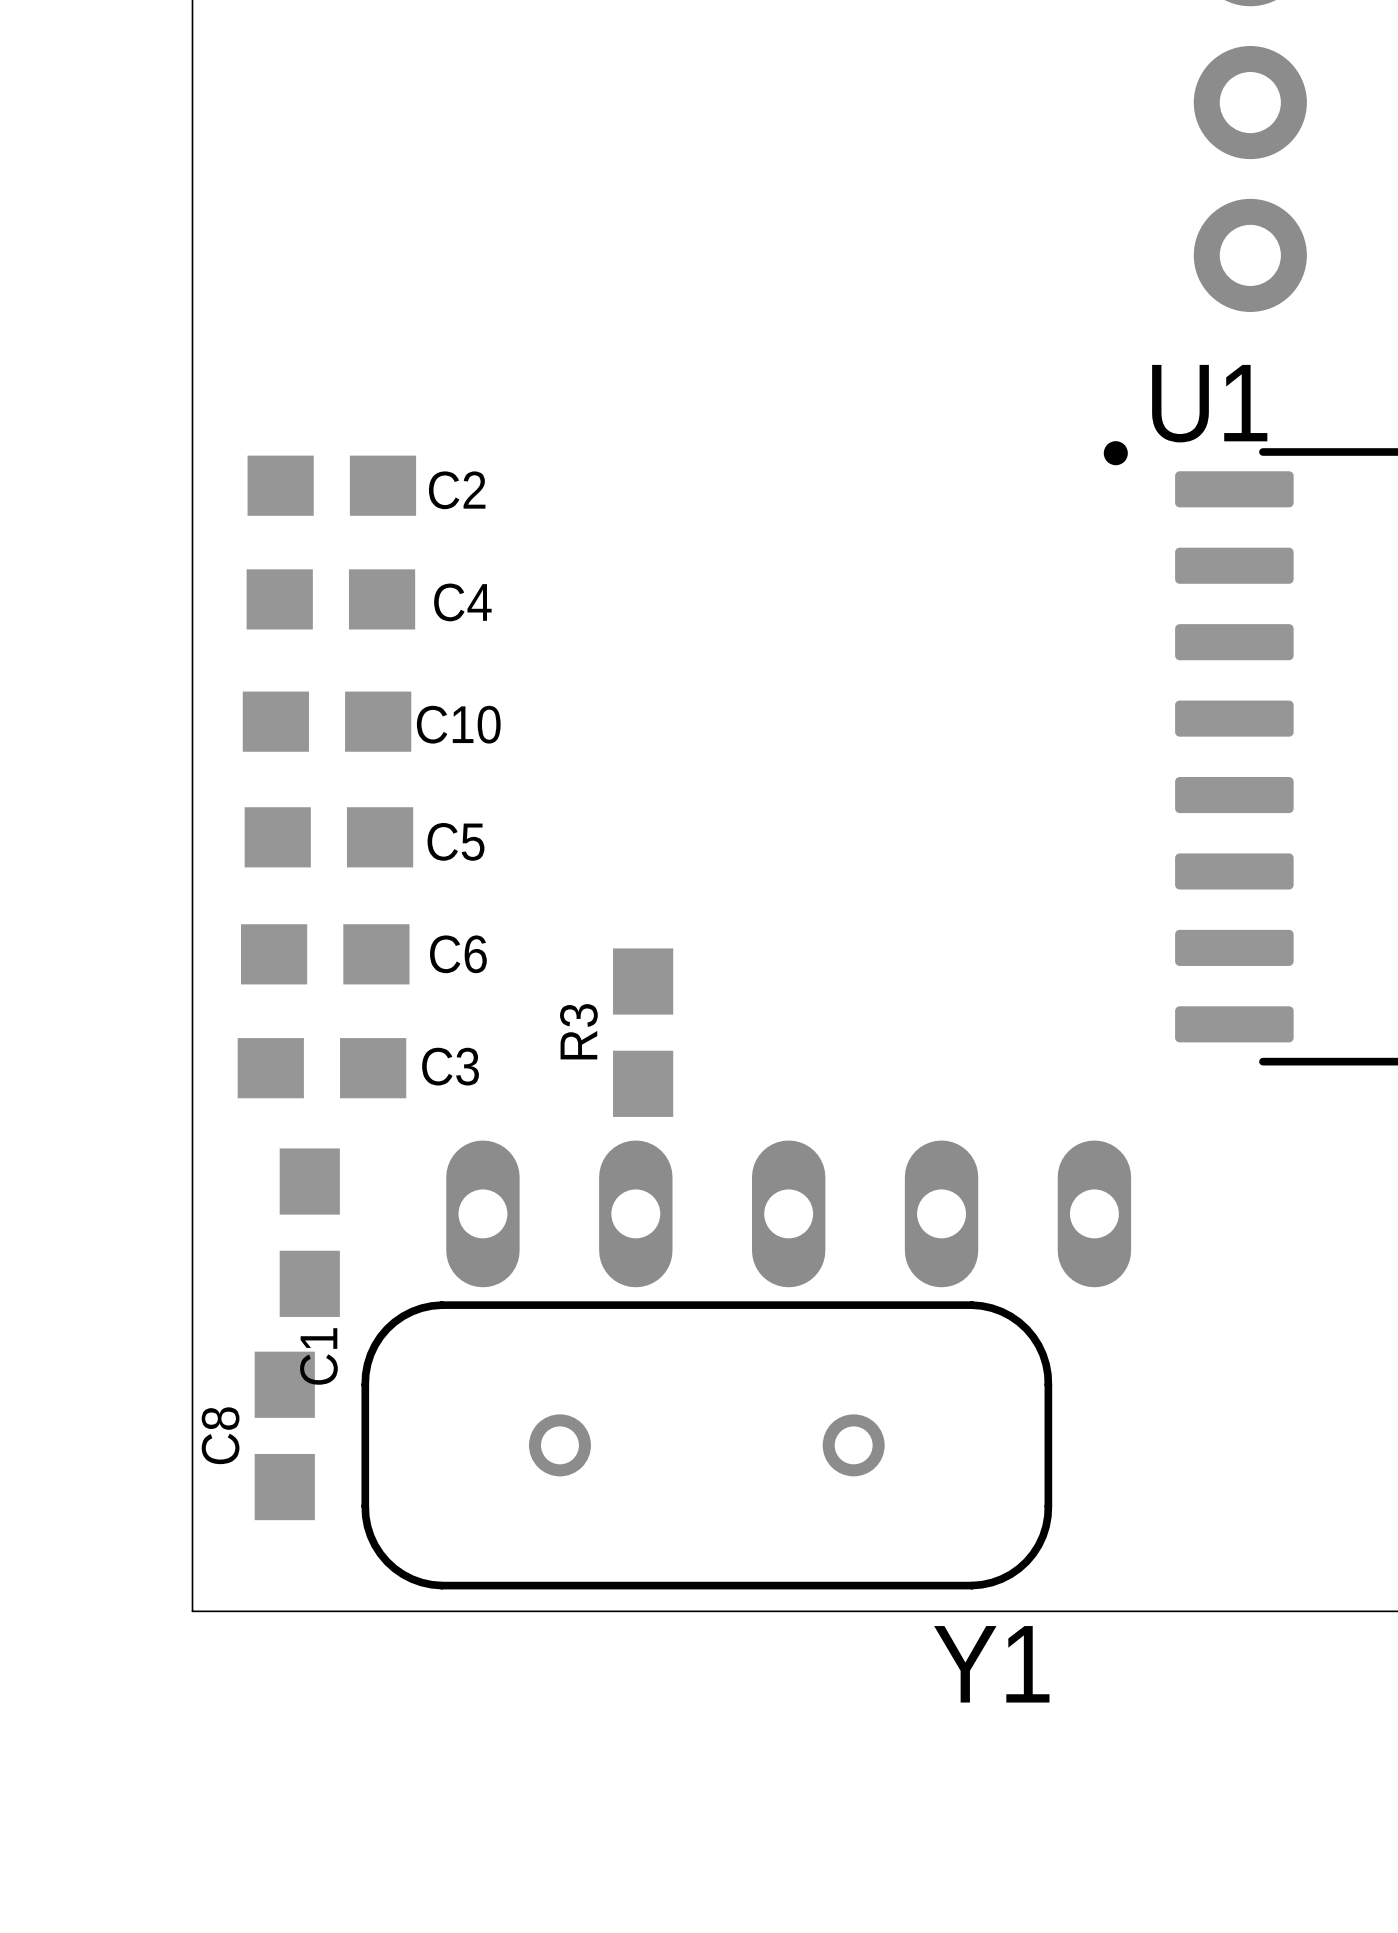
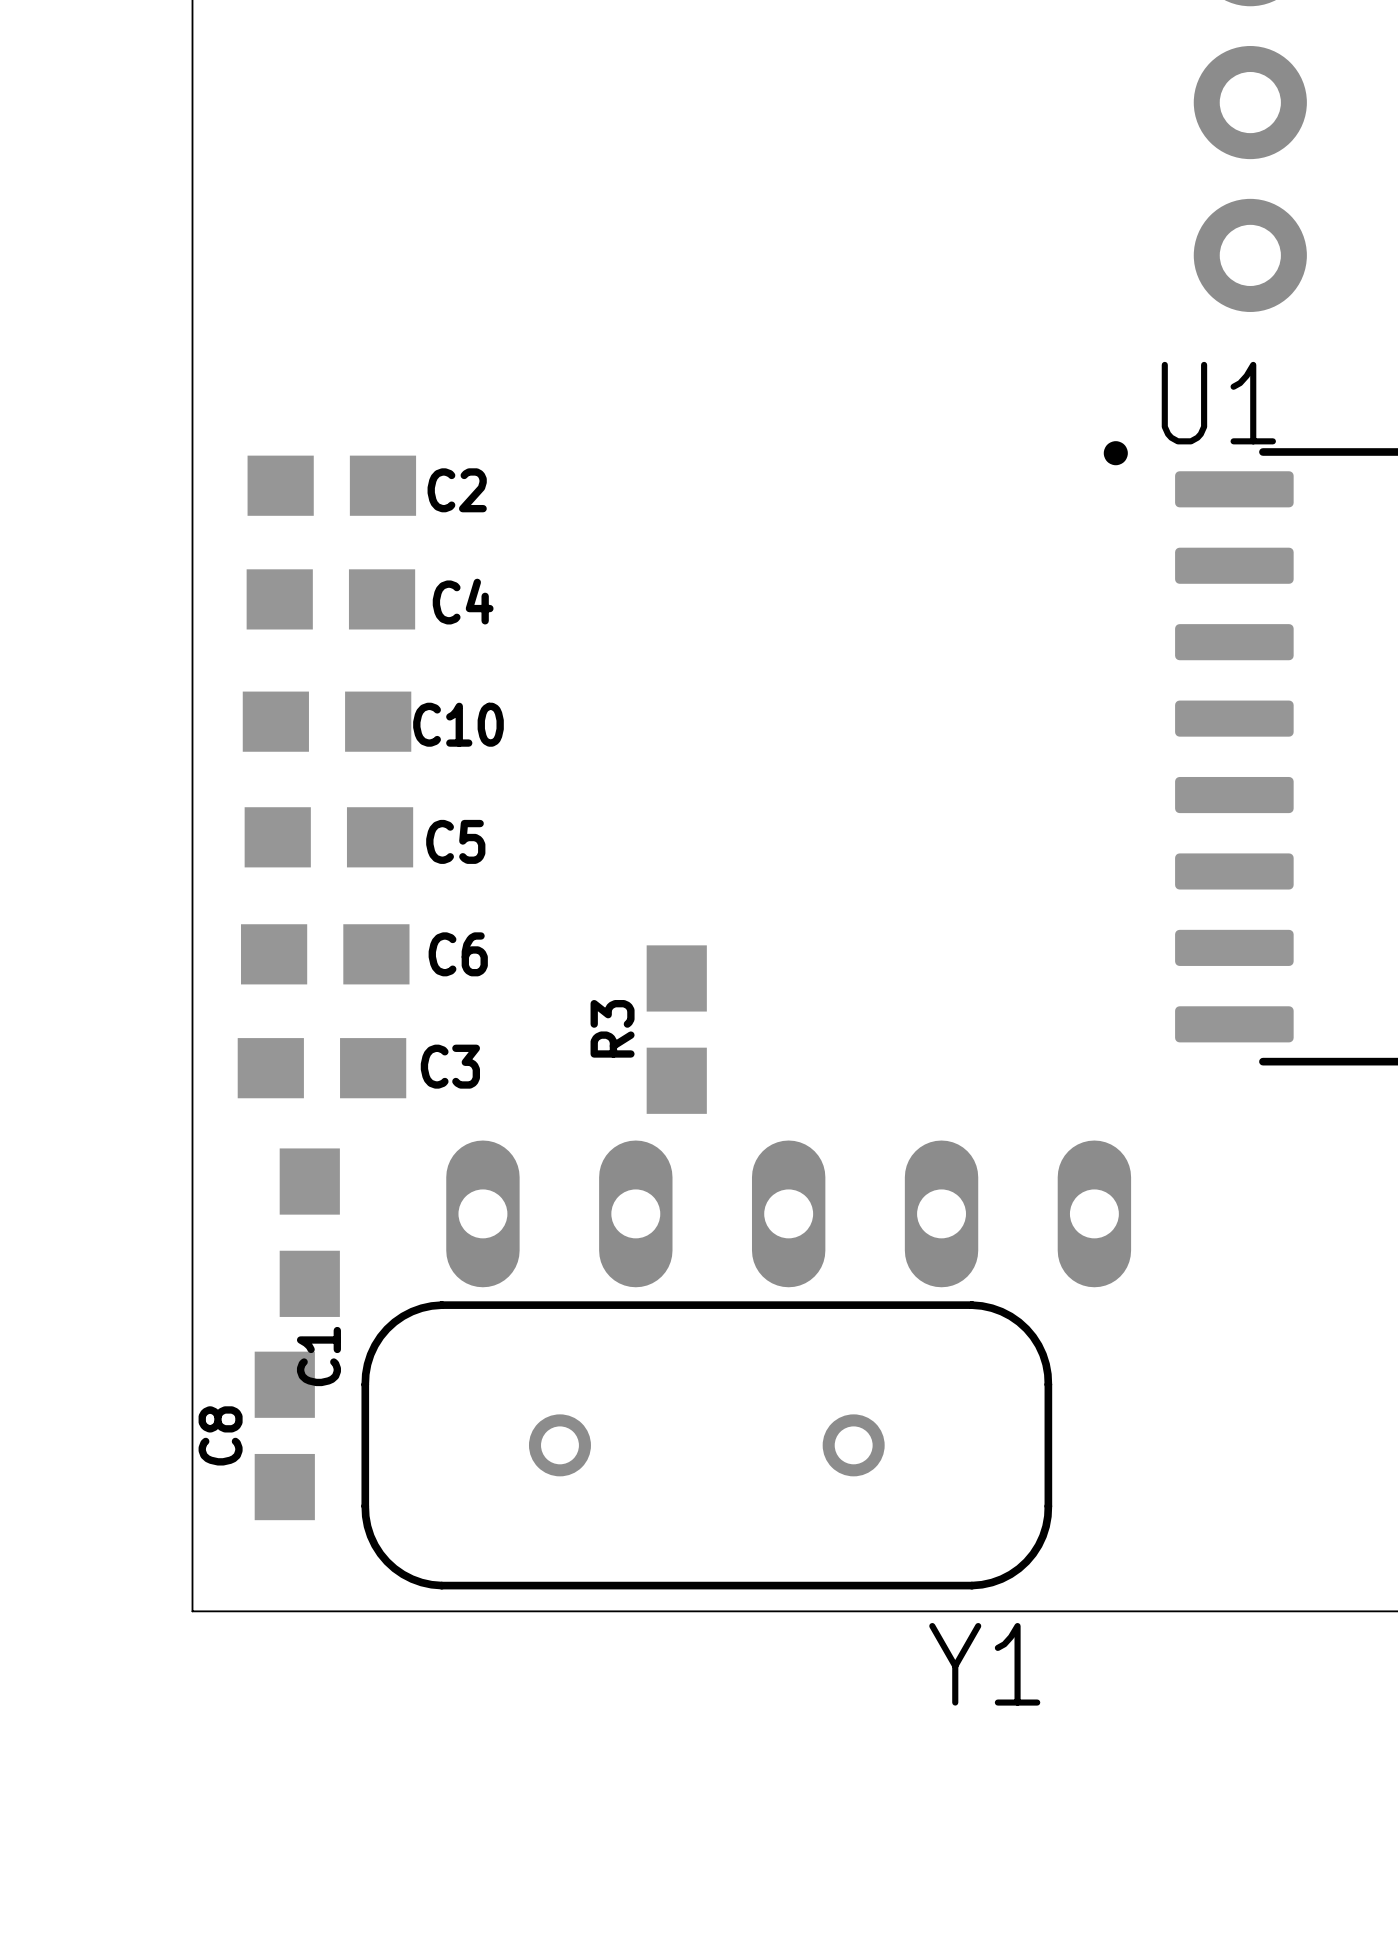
R3 position: (643, 1032) -> (676, 1029)

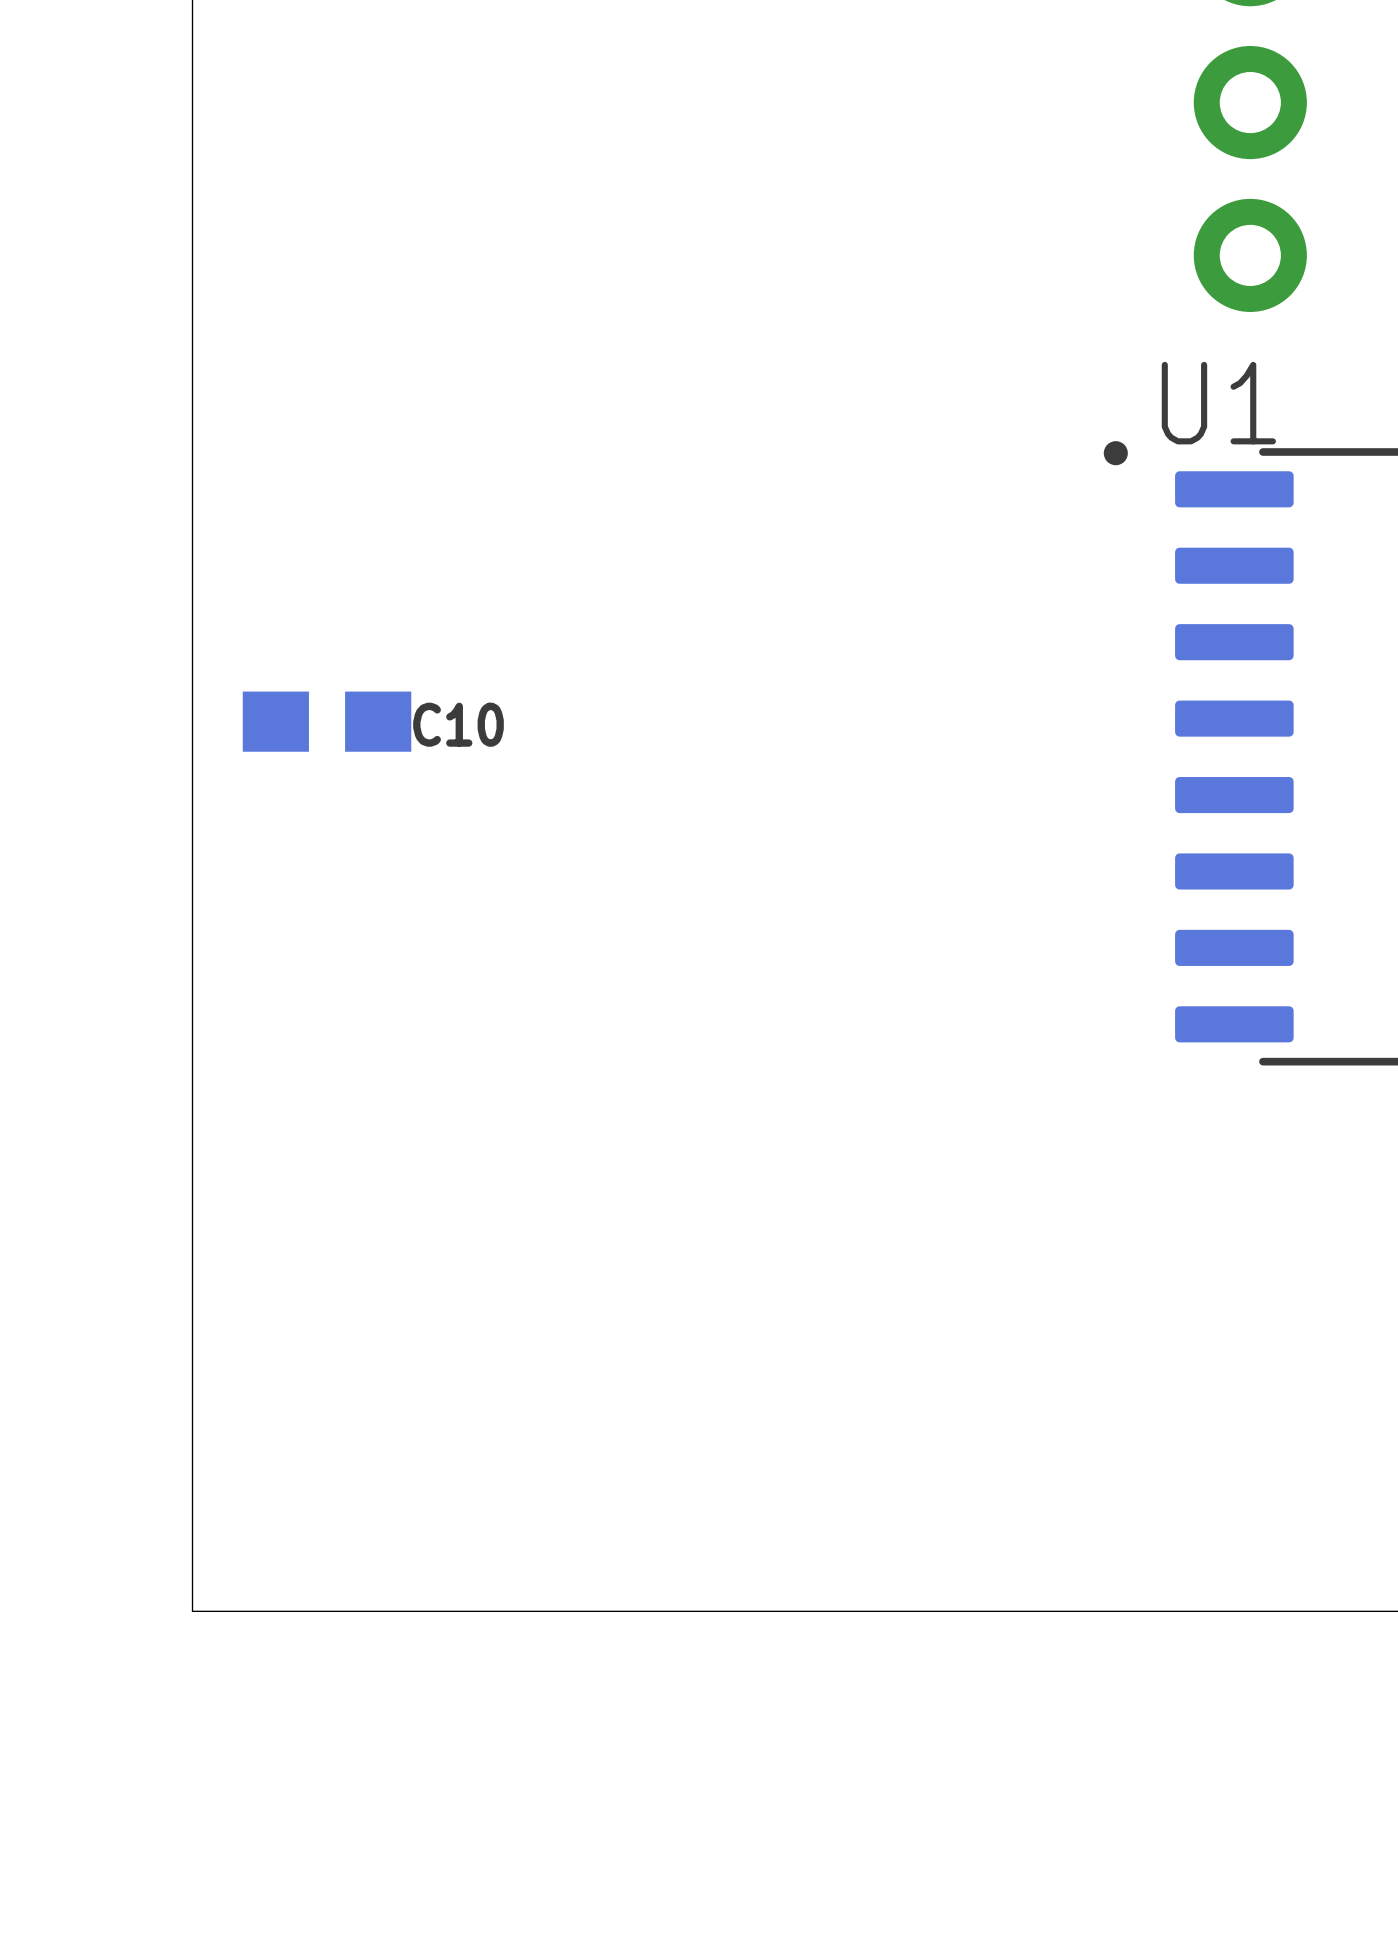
C2: (331, 485) -> none
C4: (330, 599) -> none
C5: (328, 837) -> none
C6: (325, 954) -> none
R3: (676, 1029) -> none
C3: (321, 1068) -> none
part: (788, 1213) -> none
C1: (309, 1232) -> none
C8: (284, 1435) -> none
Y1: (706, 1445) -> none

